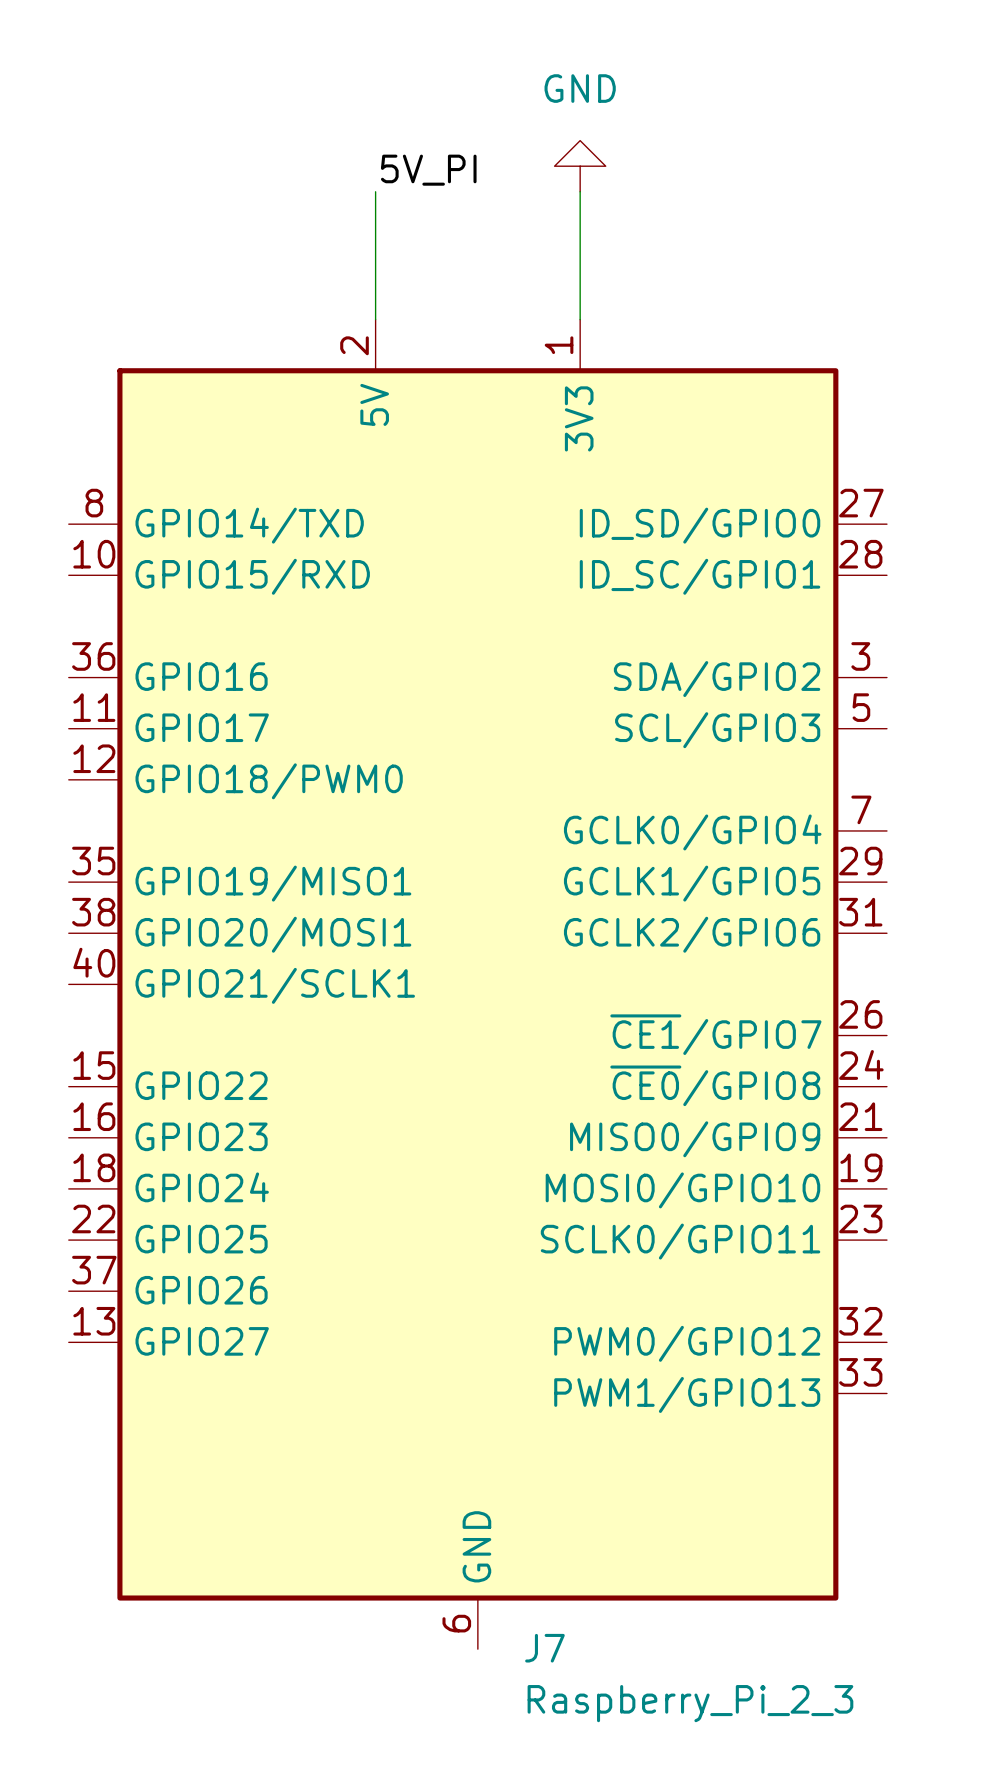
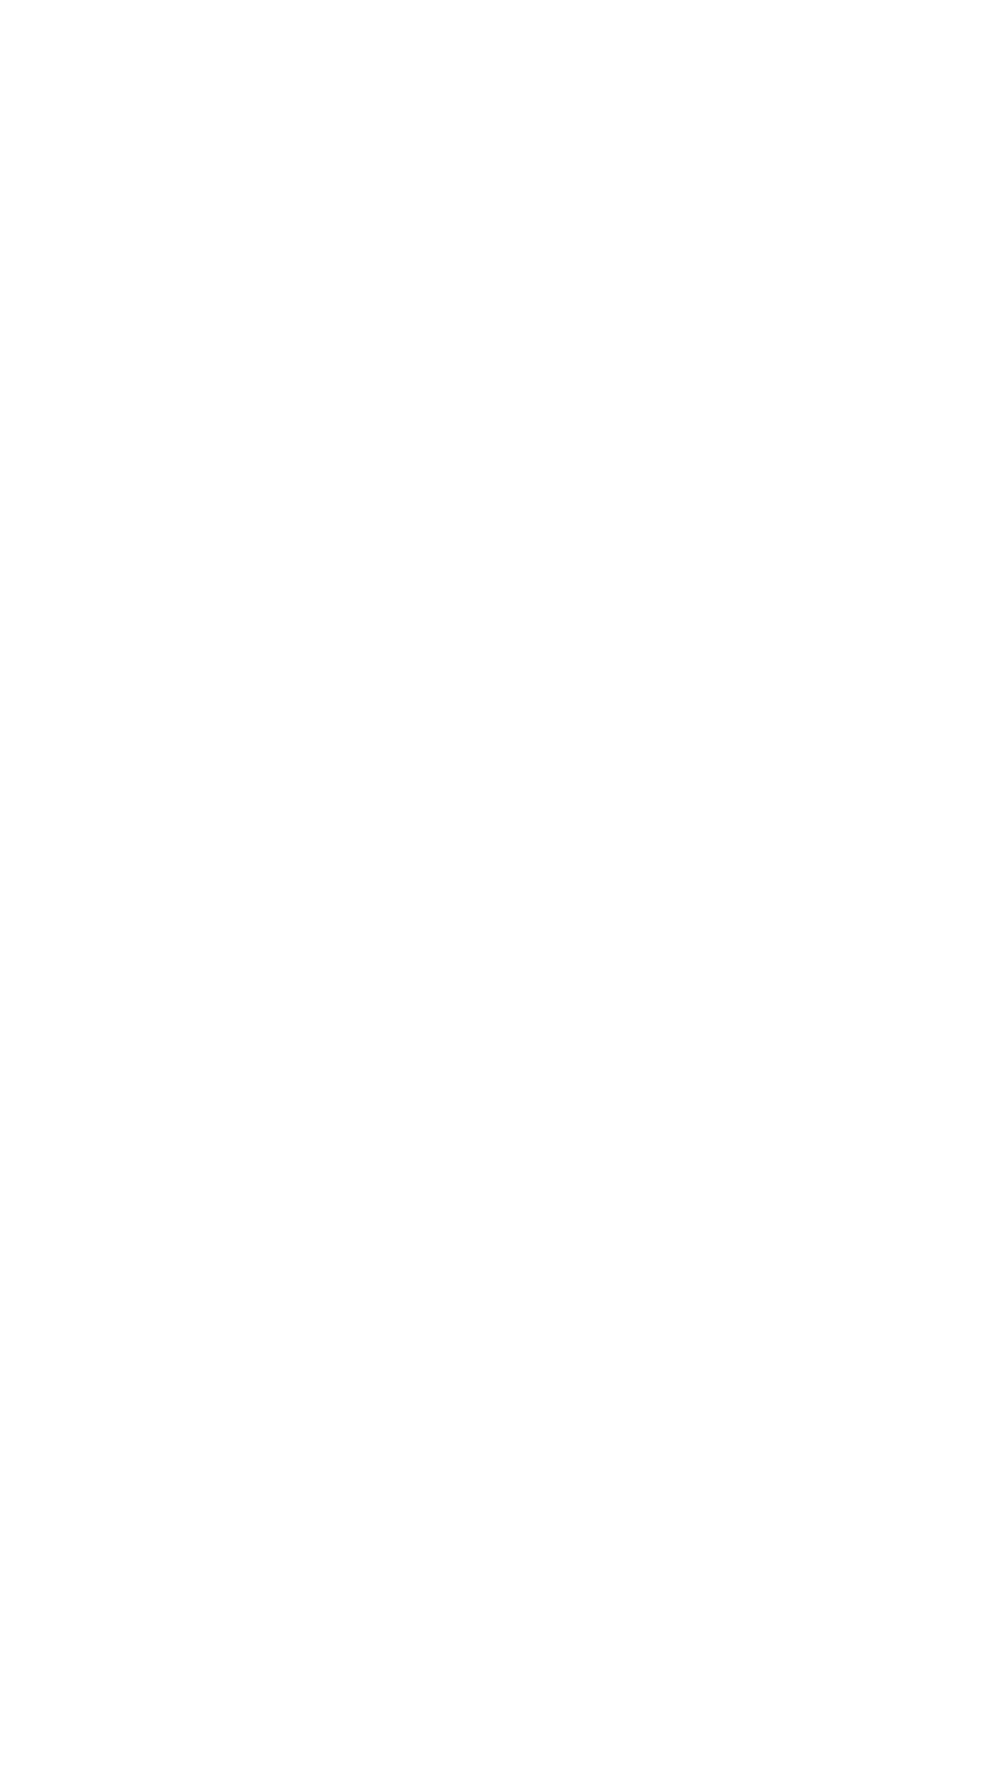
power symbol: GND (580, 166) -> none
label: 5V_PI (428, 170) -> none
wire: (375, 191) (375, 319) -> none
wire: (580, 191) (580, 319) -> none
J7: Raspberry_Pi_2_3 (477, 984) -> none

